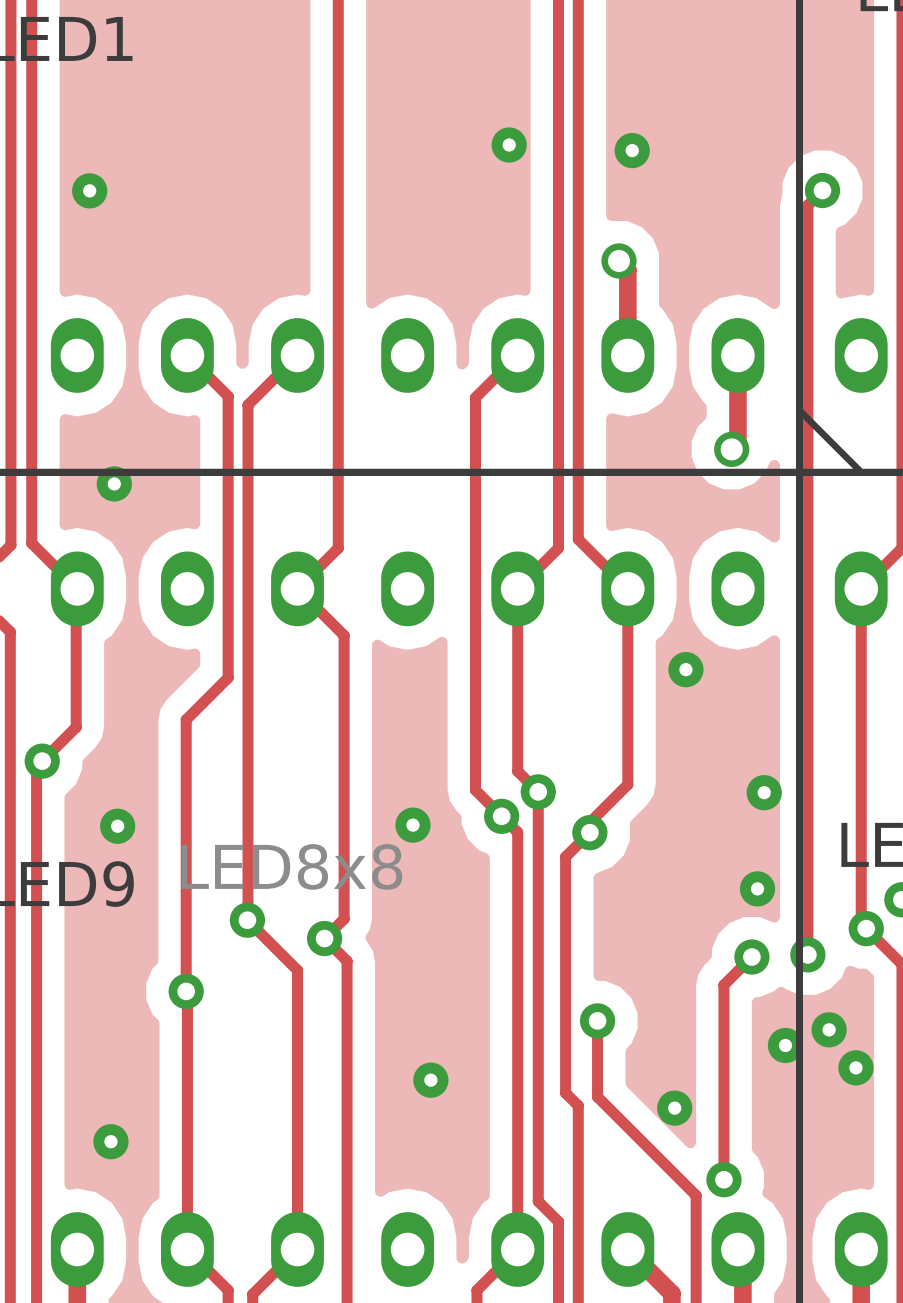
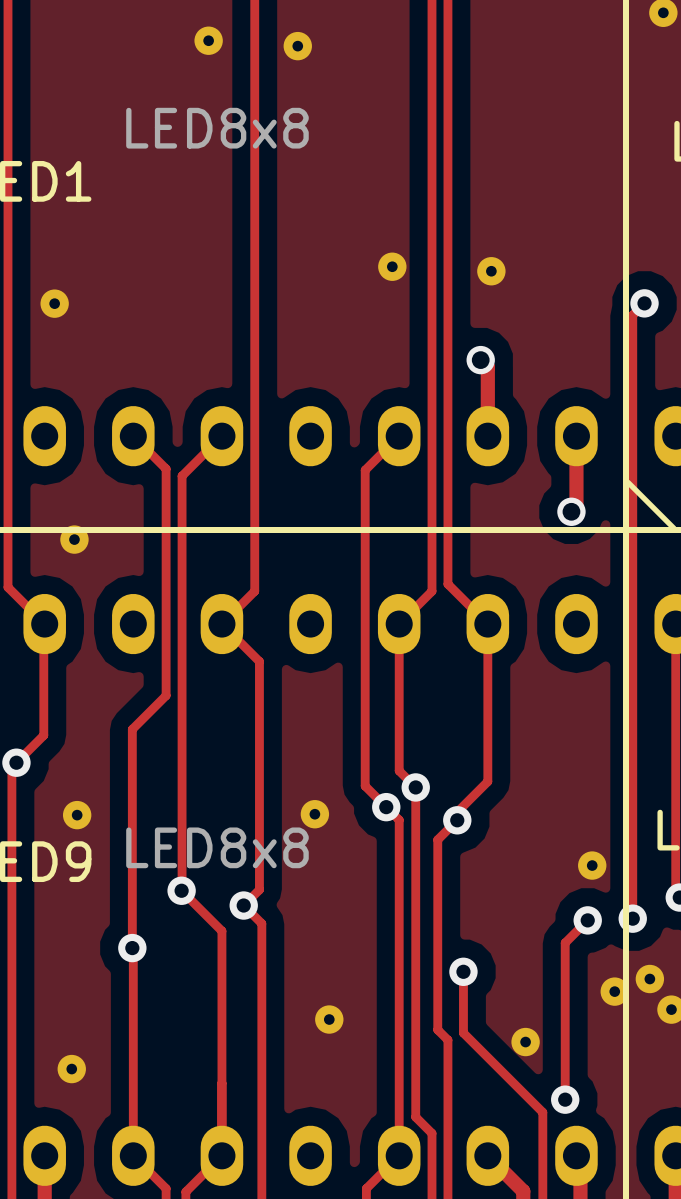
part: (685, 669) -> none
part: (764, 792) -> none

